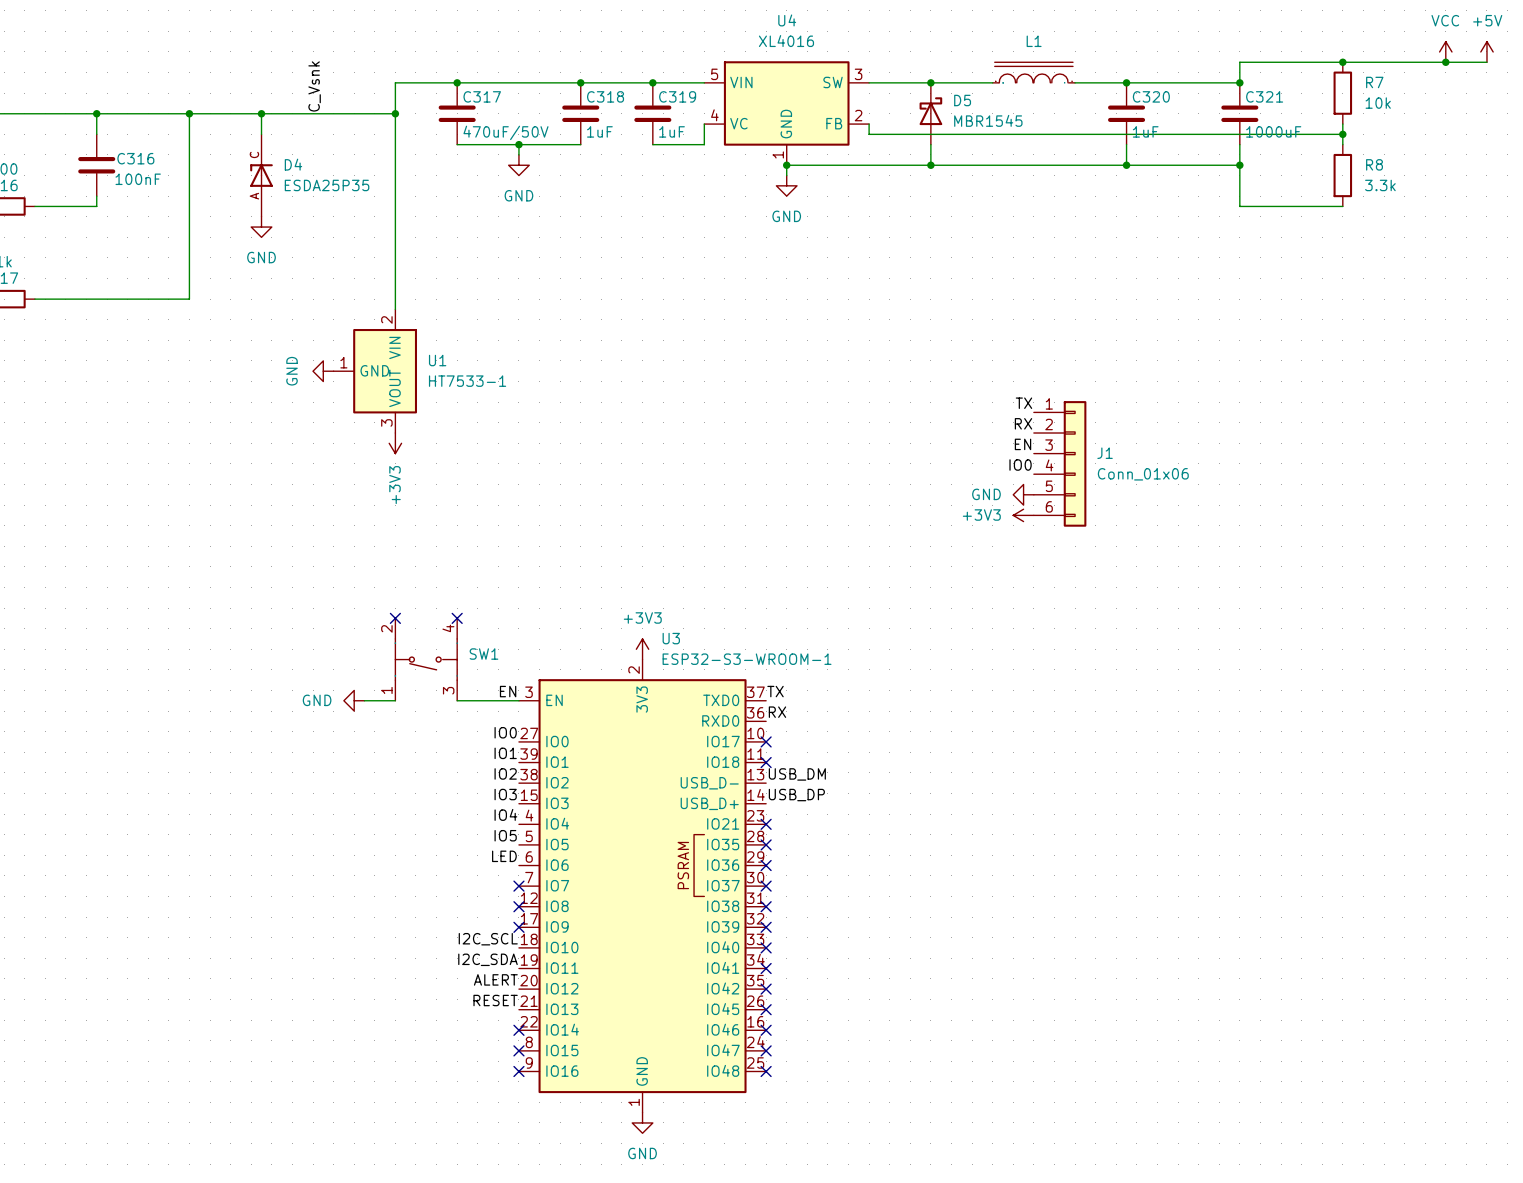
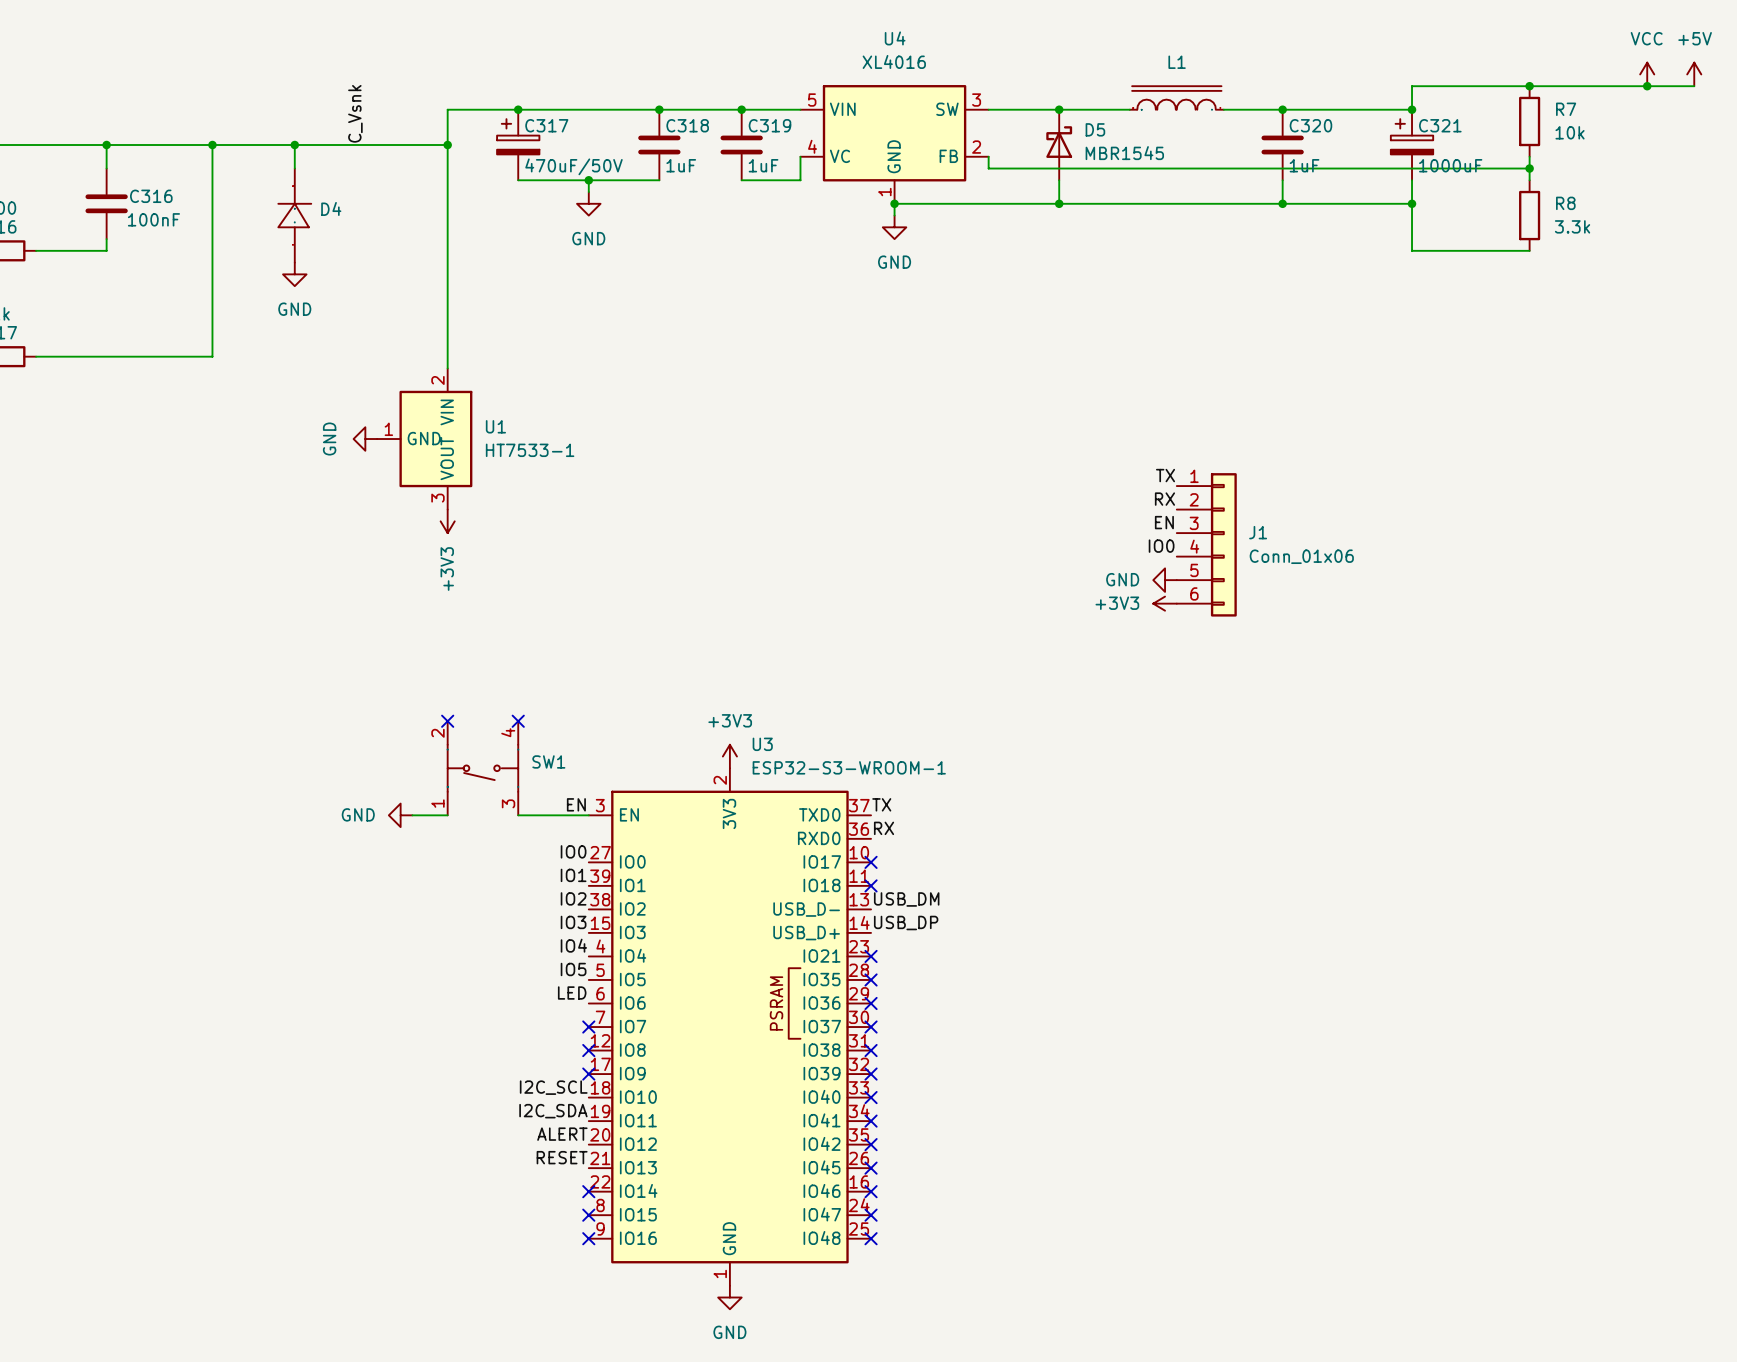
C317 symbol: [438, 82, 476, 145] -> [497, 109, 540, 181]
C321 symbol: [1221, 82, 1259, 145] -> [1390, 109, 1434, 181]
D4 symbol: [250, 134, 273, 217] -> [278, 168, 312, 263]
D4 value: ESDA25P35 (327, 185) -> none

